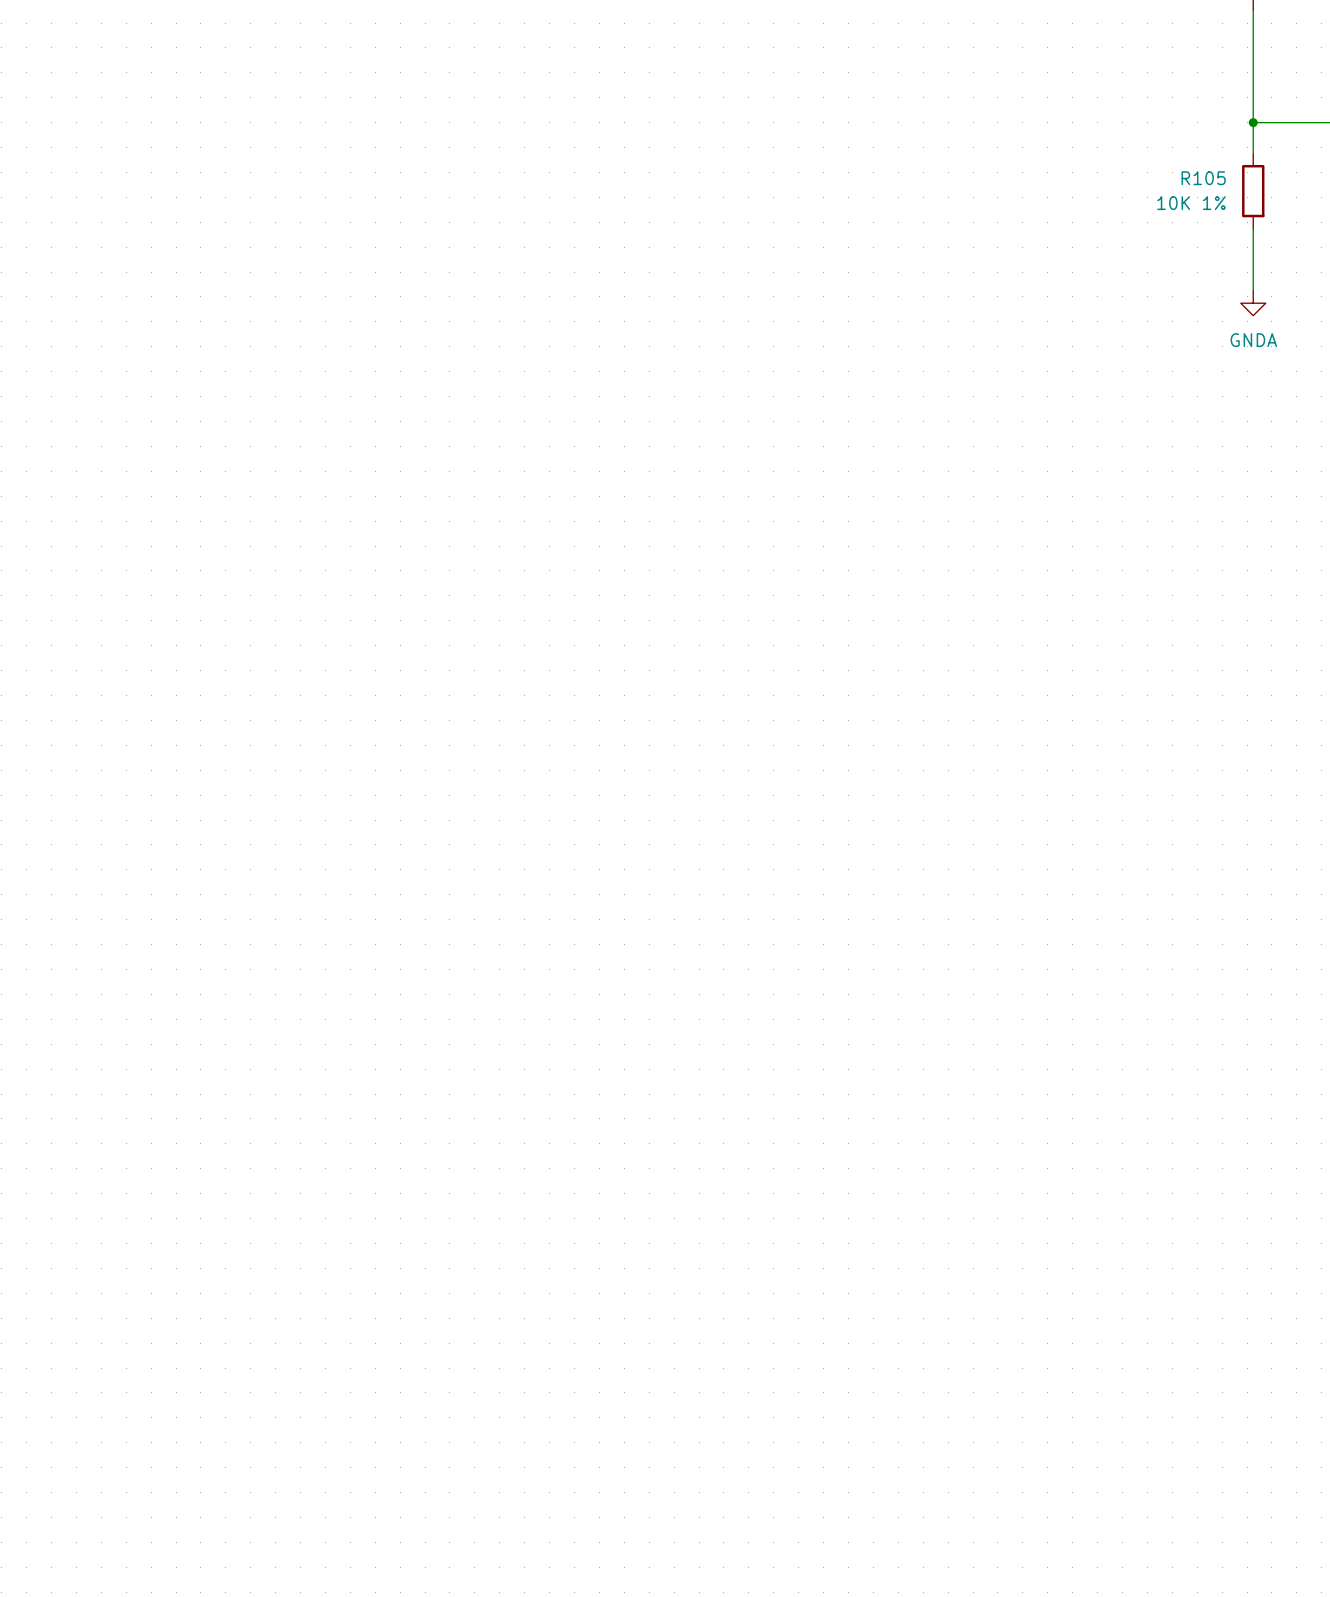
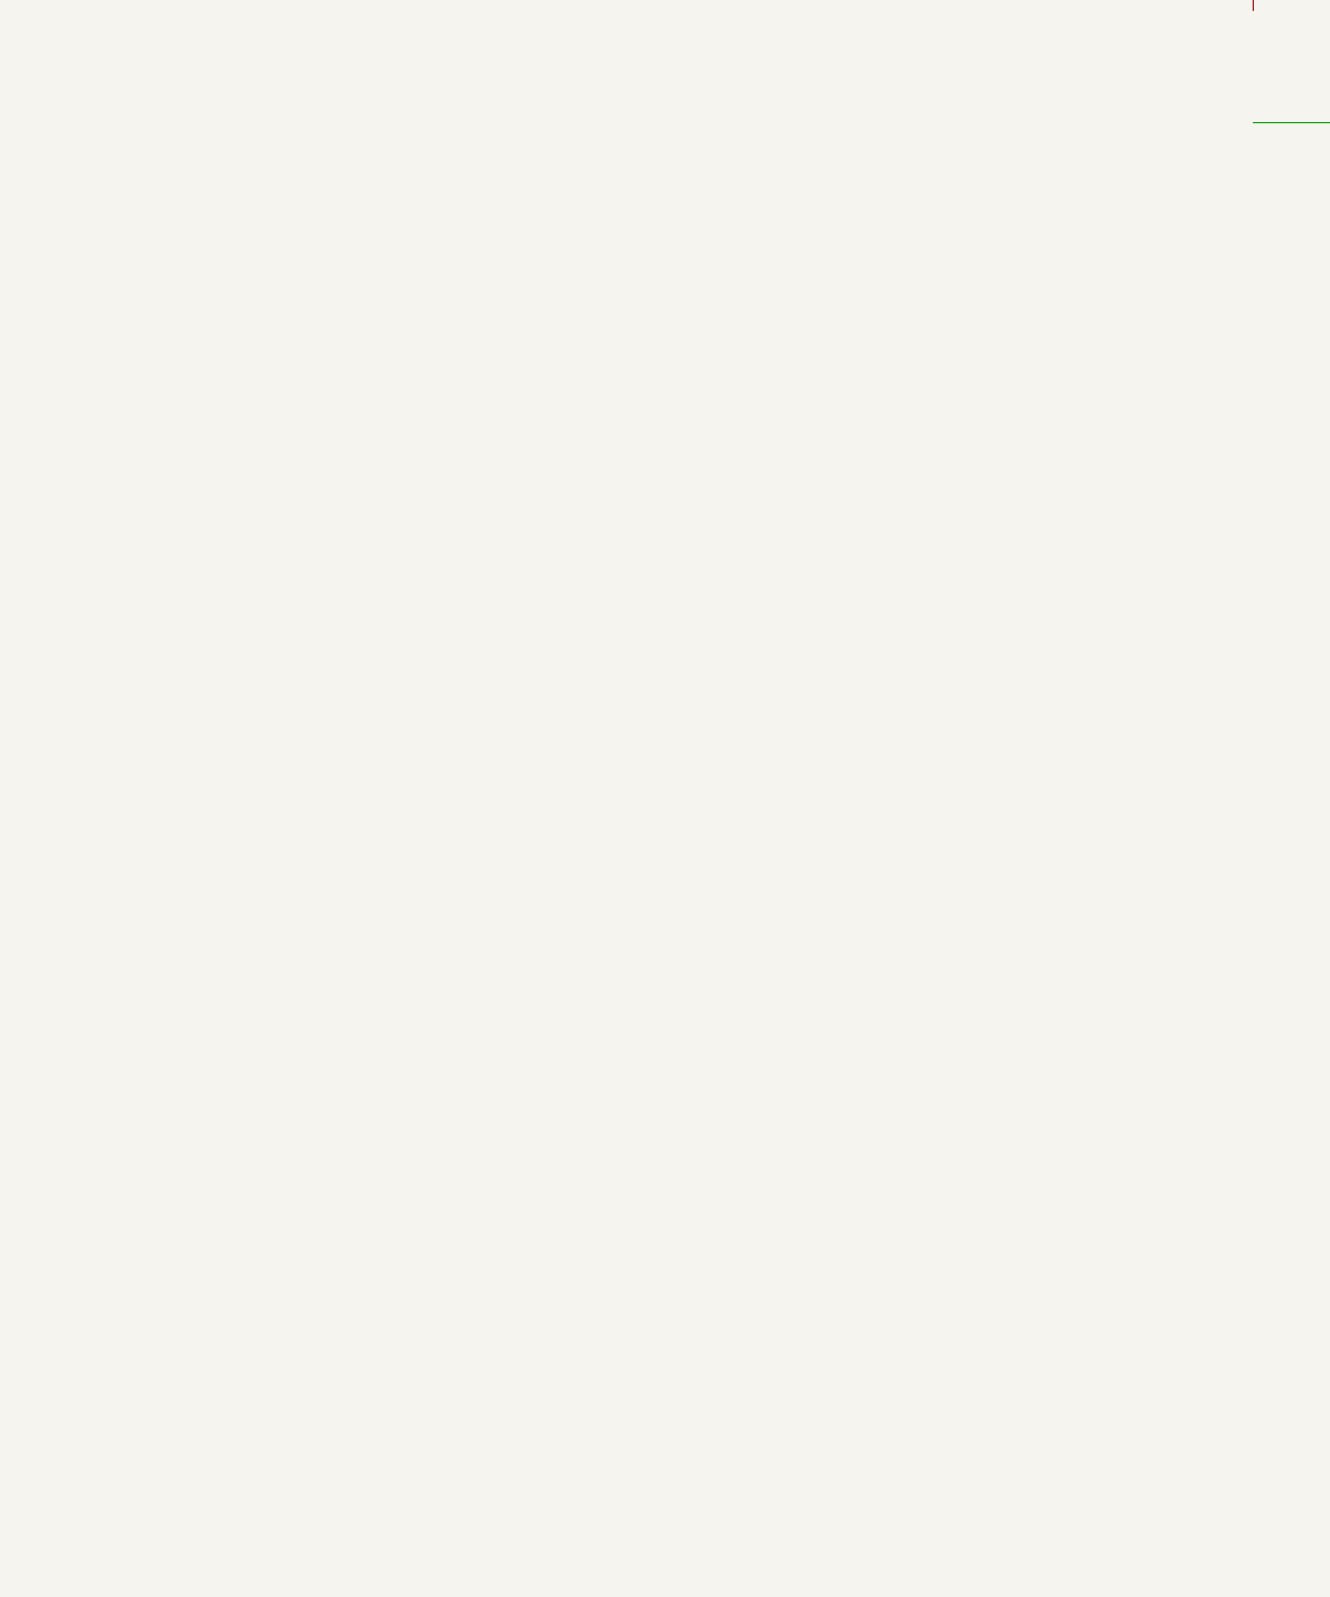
wire: (1253, 10) (1253, 153) -> none
junction: (1253, 122) -> none
R105: 10K 1% (1253, 191) -> none
wire: (1253, 228) (1253, 290) -> none
power symbol: GNDA (1253, 303) -> none

